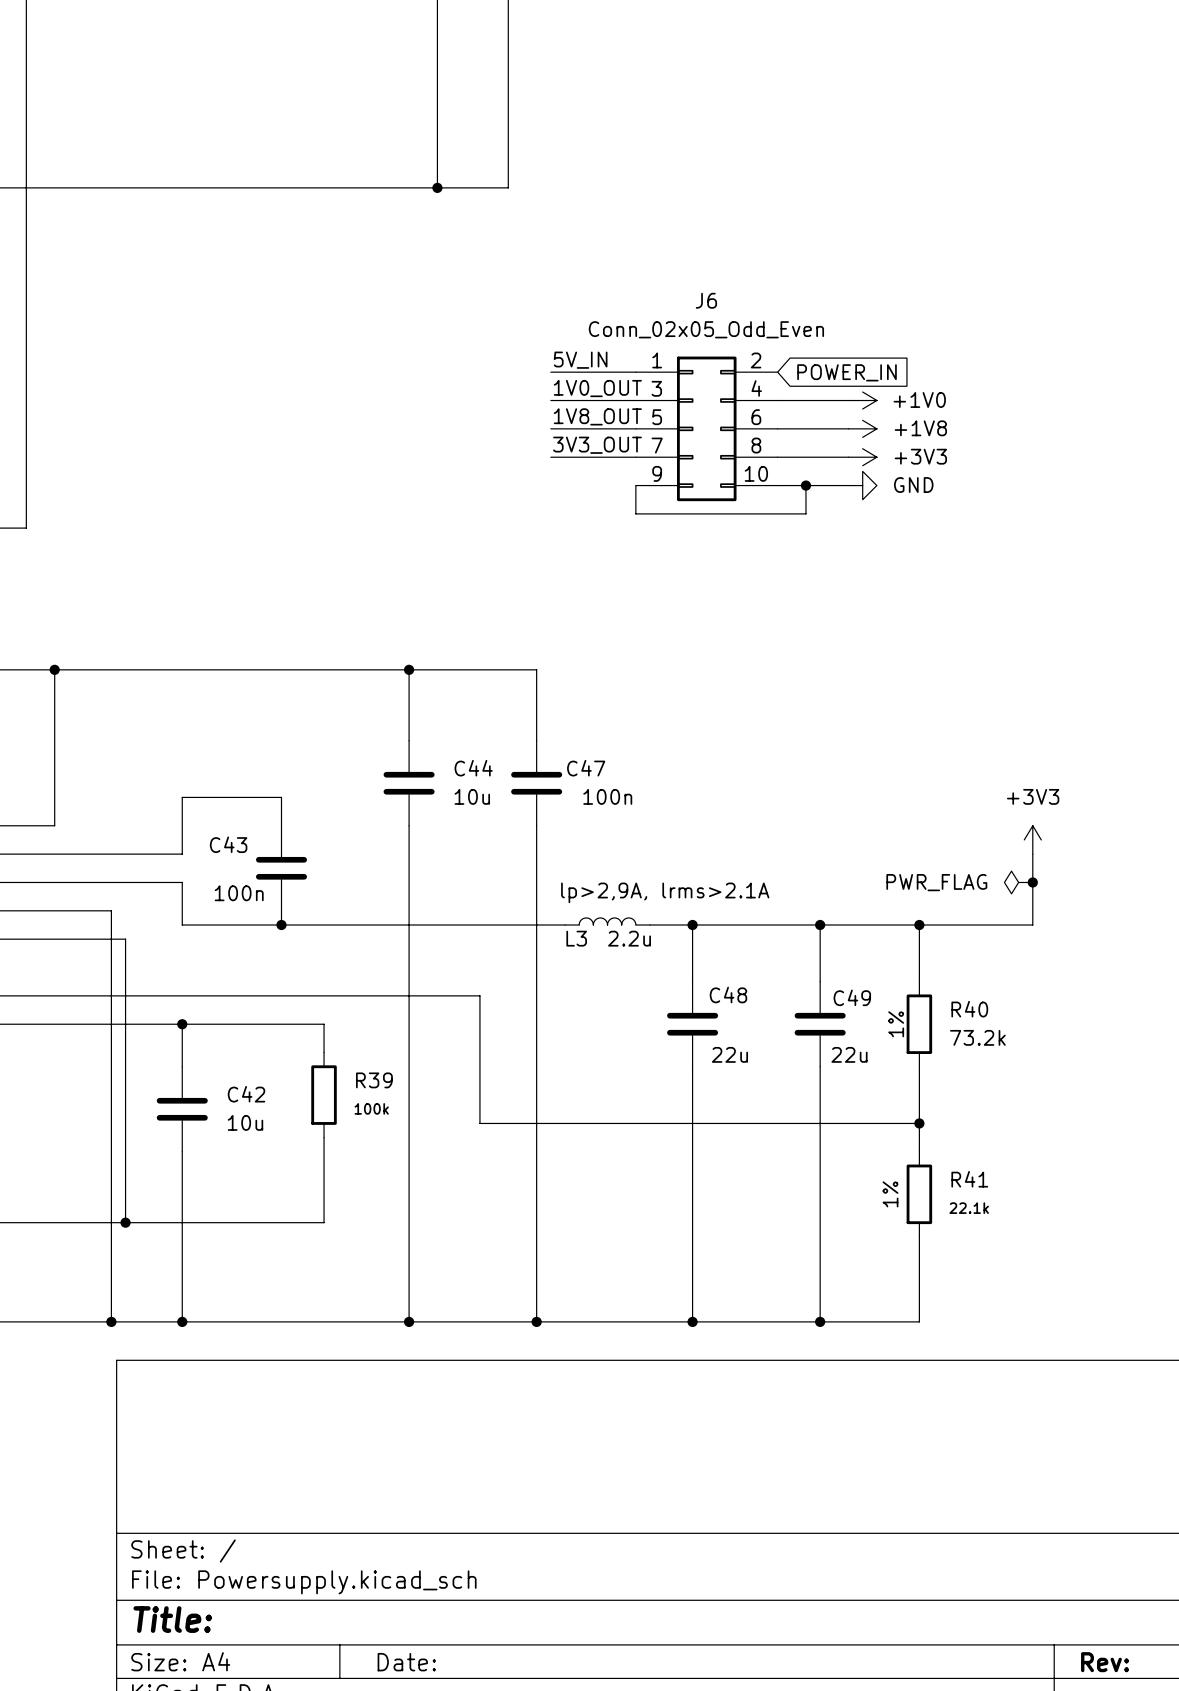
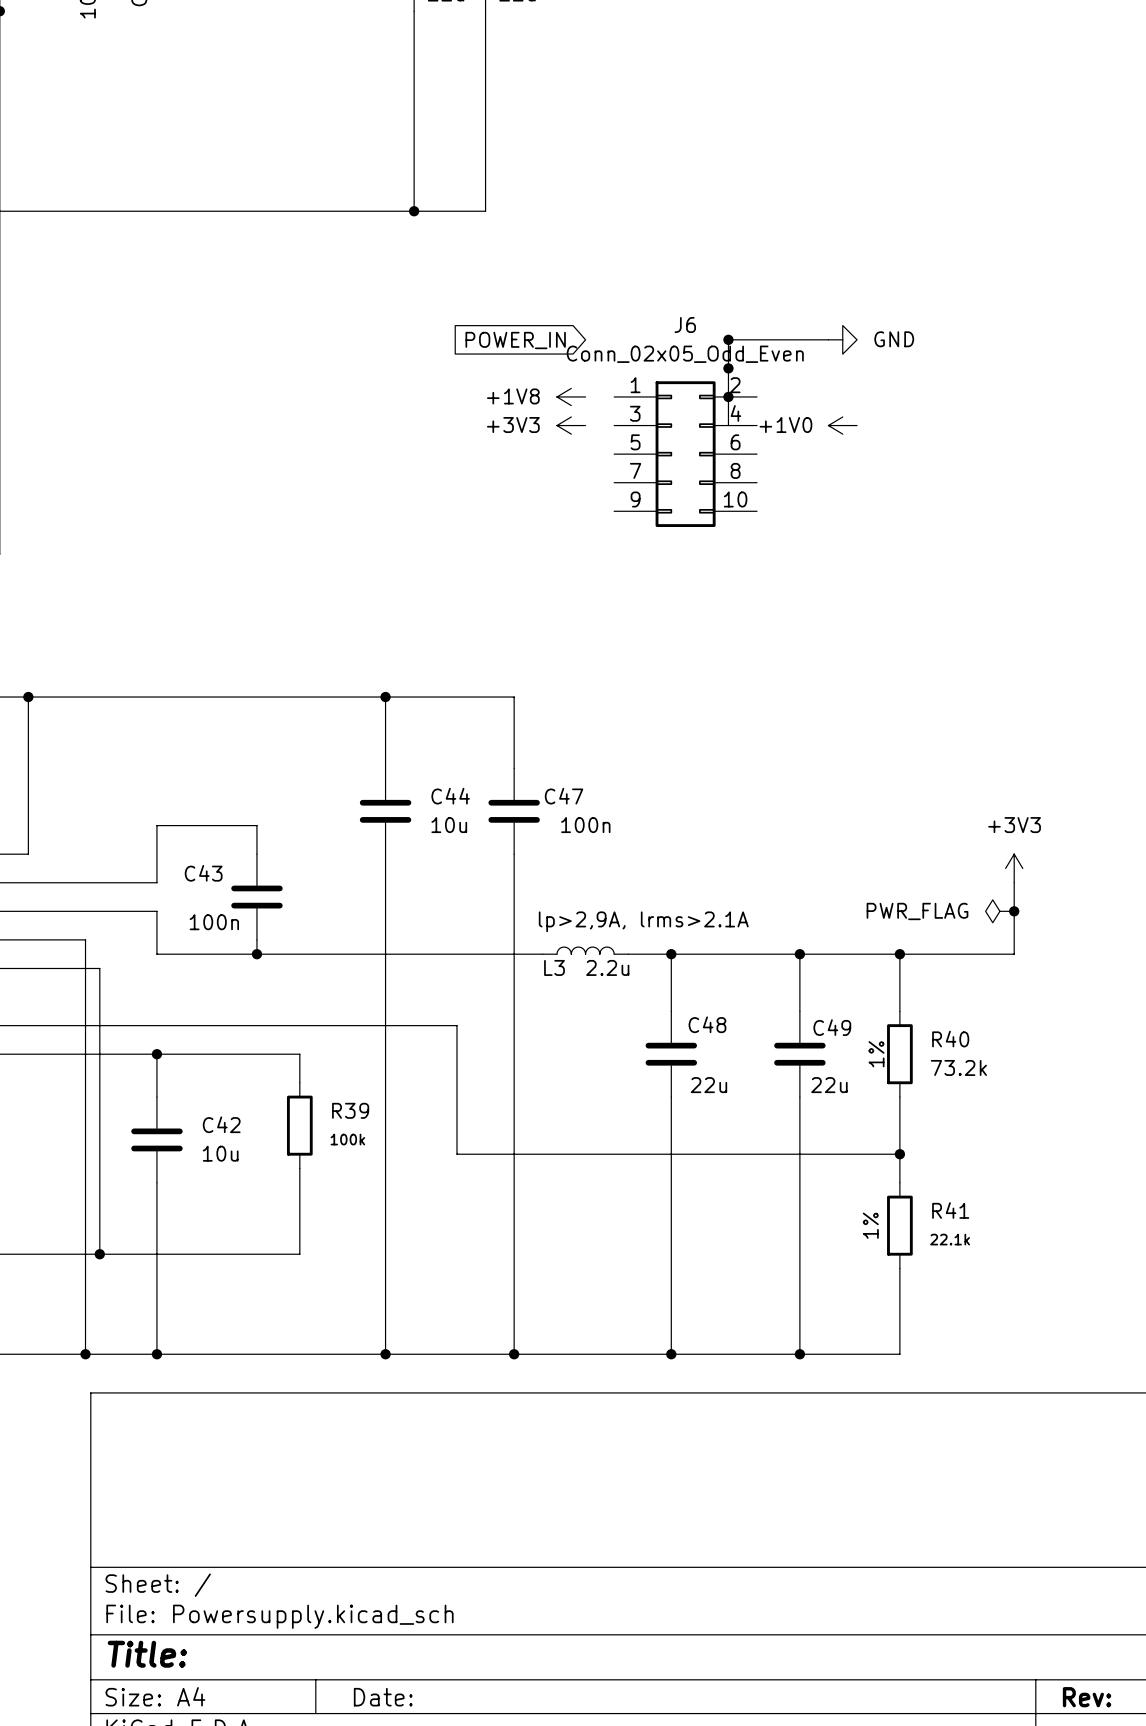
junction: none -> (728, 339)
wire: none -> (828, 339) (728, 339) (728, 425)
junction: none -> (728, 368)
label: 5V_IN (580, 360) -> none
wire: (550, 372) (635, 372) -> none
junction: none -> (728, 396)
global label rotation: 0° (847, 372) -> 180° (515, 340)
global label position: POWER_IN (847, 372) -> POWER_IN (515, 340)
label: 1V0_OUT (597, 388) -> none
wire: (550, 400) (635, 400) -> none
wire: (777, 400) (848, 400) -> none
power symbol rotation: 0° (862, 400) -> 180° (842, 425)
label: 1V8_OUT (597, 416) -> none
wire: (550, 428) (635, 428) -> none
wire: (777, 428) (848, 428) -> none
power symbol rotation: 0° (862, 428) -> 180° (571, 396)
power symbol position: +1V8 (862, 428) -> +1V8 (571, 396)
label: 3V3_OUT (597, 445) -> none
wire: (550, 457) (635, 457) -> none
wire: (777, 457) (848, 457) -> none
power symbol rotation: 0° (862, 457) -> 180° (571, 425)
power symbol position: +3V3 (862, 457) -> +3V3 (571, 425)
wire: (635, 485) (635, 513) (805, 513) (805, 485) -> none
wire: (777, 485) (848, 485) -> none
junction: (805, 485) -> none
power symbol position: GND (862, 485) -> GND (842, 339)

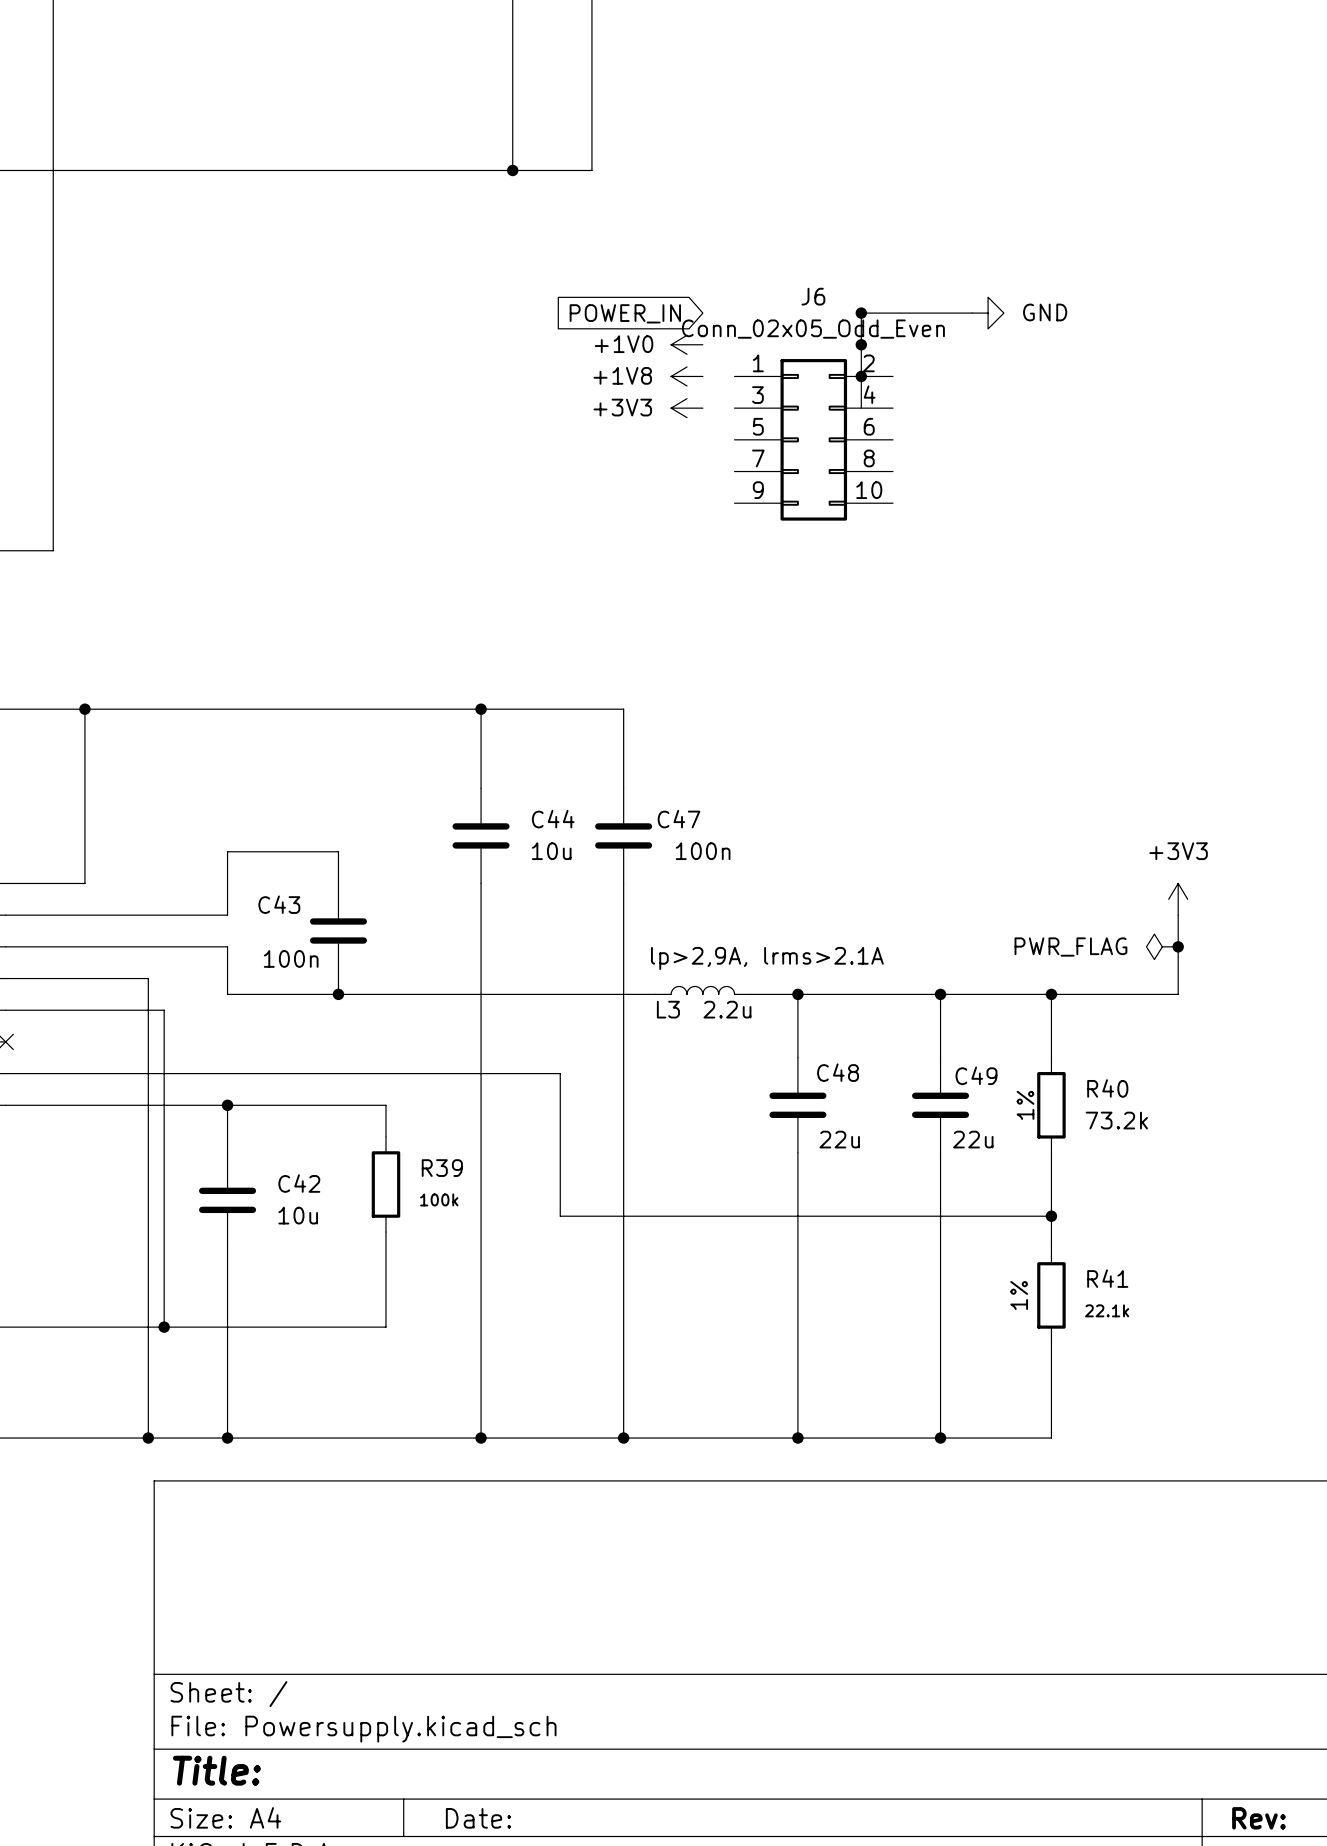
power symbol position: +1V0 (842, 425) -> +1V0 (687, 344)

